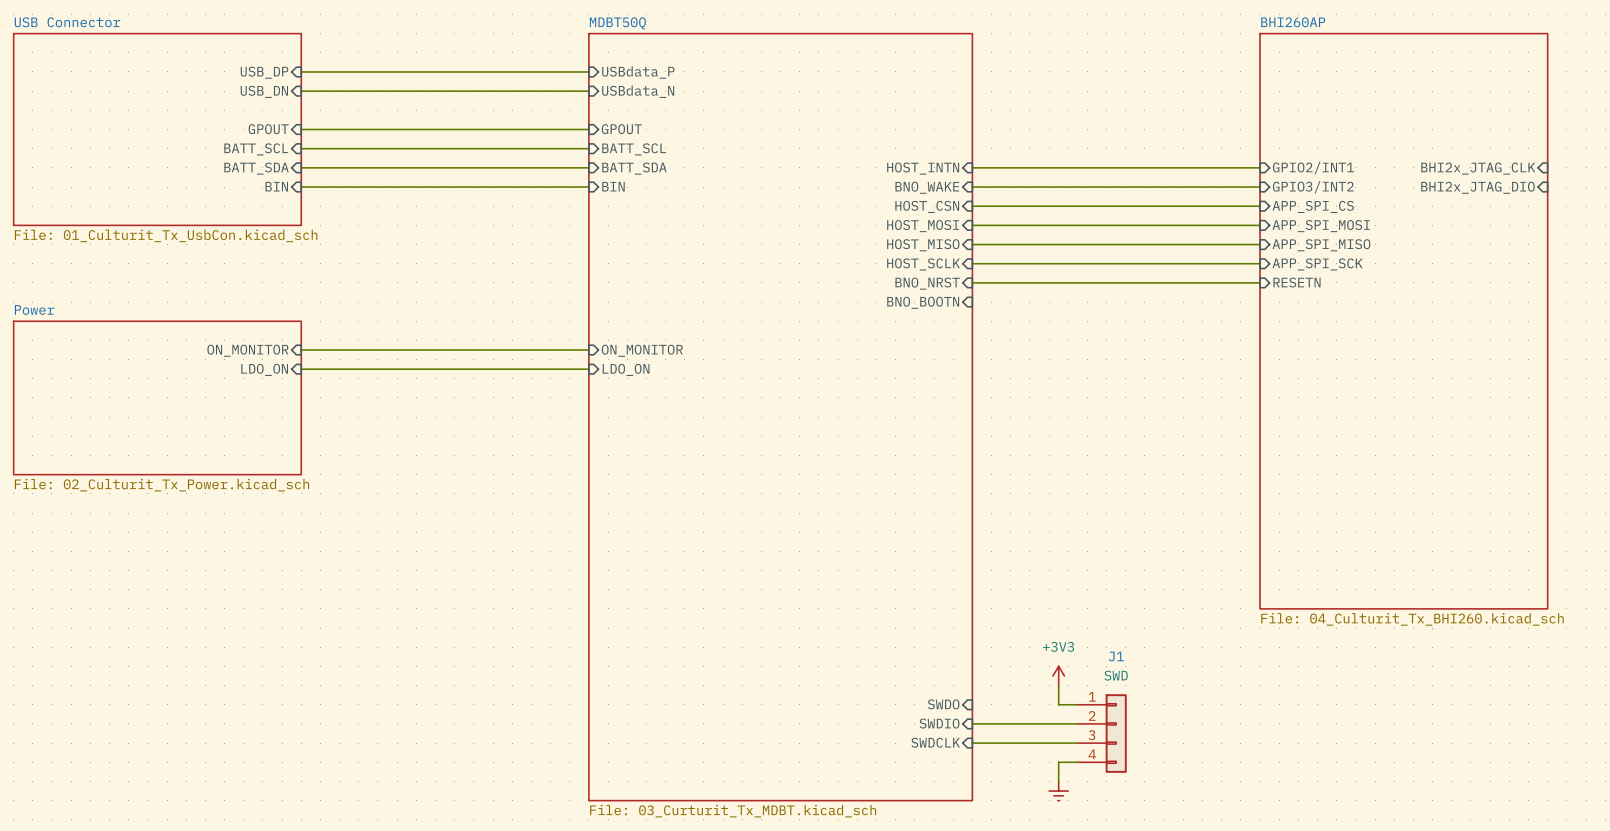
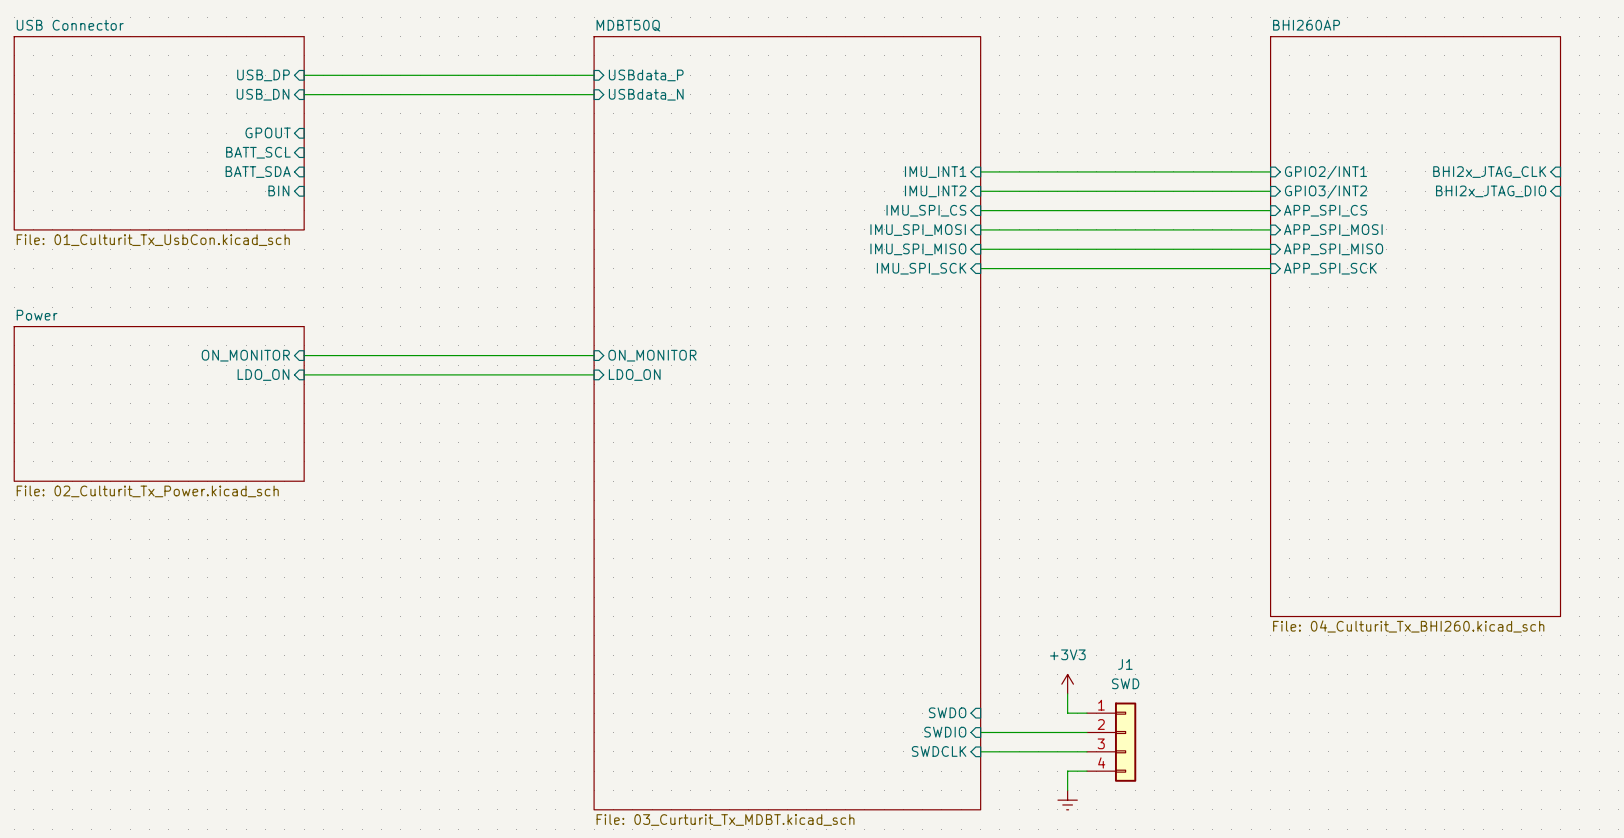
wire: (301, 129) (588, 129) -> none
sheet pin: GPOUT (621, 129) -> none
wire: (301, 148) (588, 148) -> none
sheet pin: BATT_SCL (634, 149) -> none
wire: (301, 167) (588, 167) -> none
sheet pin: BATT_SDA (634, 168) -> none
sheet pin: HOST_INTN (923, 168) -> IMU_INT1 (935, 172)
sheet pin: BIN (613, 186) -> none
wire: (301, 187) (588, 187) -> none
sheet pin: BNO_WAKE (927, 187) -> IMU_INT2 (935, 191)
sheet pin: HOST_CSN (927, 206) -> IMU_SPI_CS (926, 210)
sheet pin: HOST_MOSI (923, 226) -> IMU_SPI_MOSI (918, 230)
sheet pin: HOST_MISO (923, 245) -> IMU_SPI_MISO (918, 249)
sheet pin: HOST_SCLK (923, 264) -> IMU_SPI_SCK (921, 268)
wire: (972, 282) (1260, 282) -> none
sheet pin: RESETN (1296, 282) -> none
sheet pin: BNO_NRST (927, 283) -> none
sheet pin: BNO_BOOTN (923, 302) -> none

